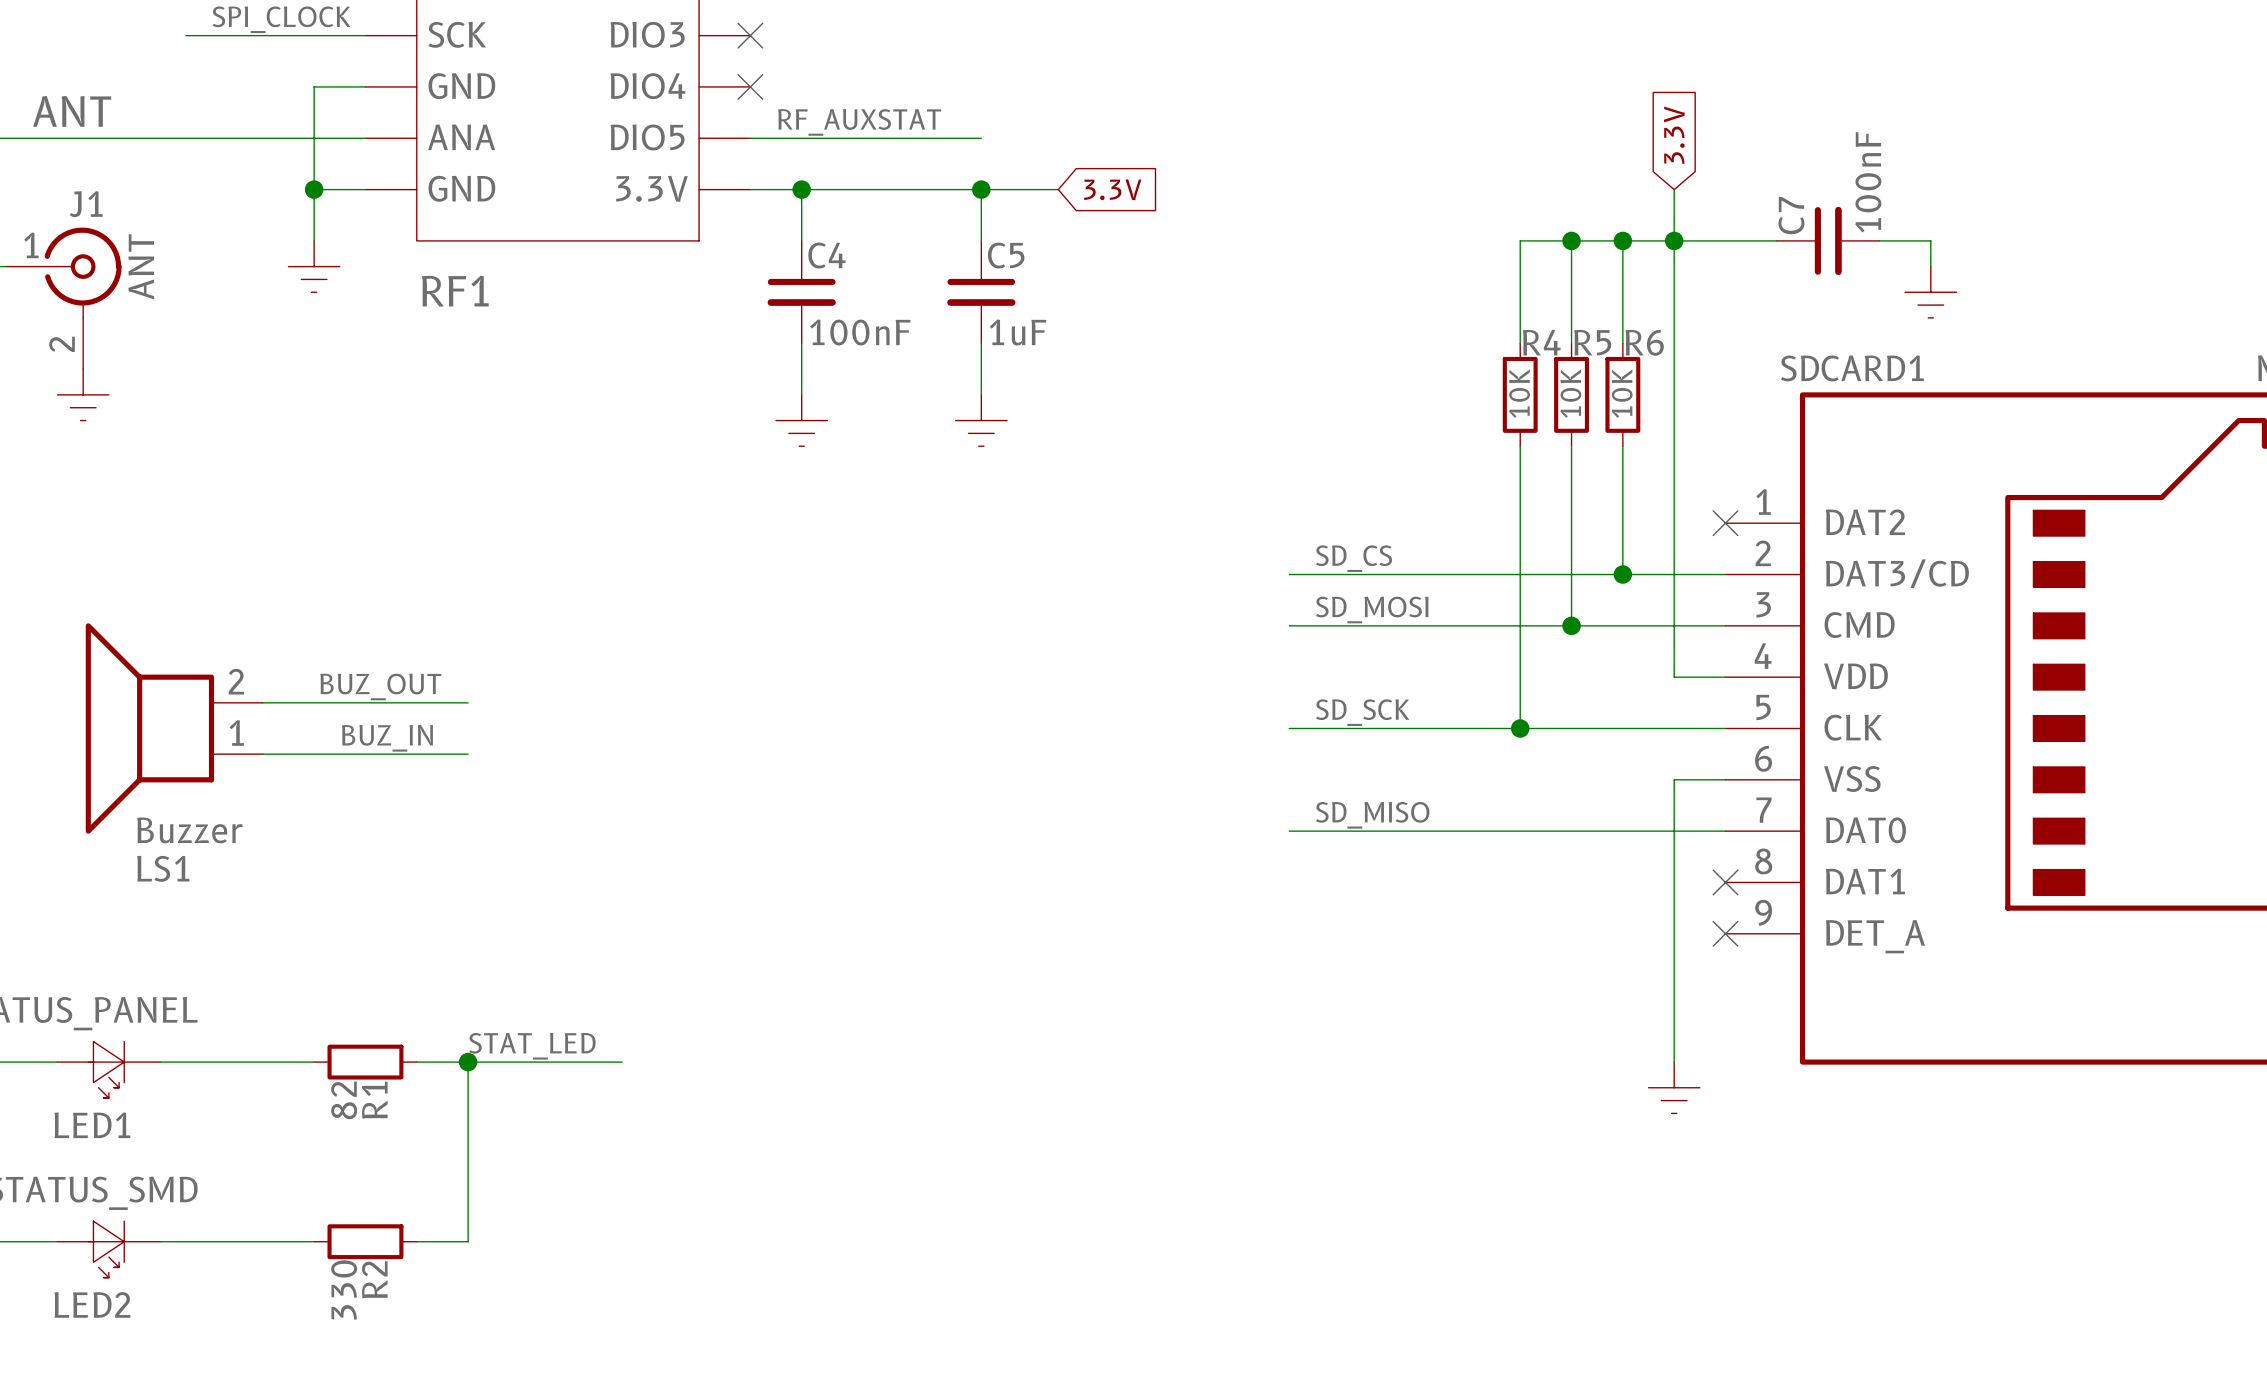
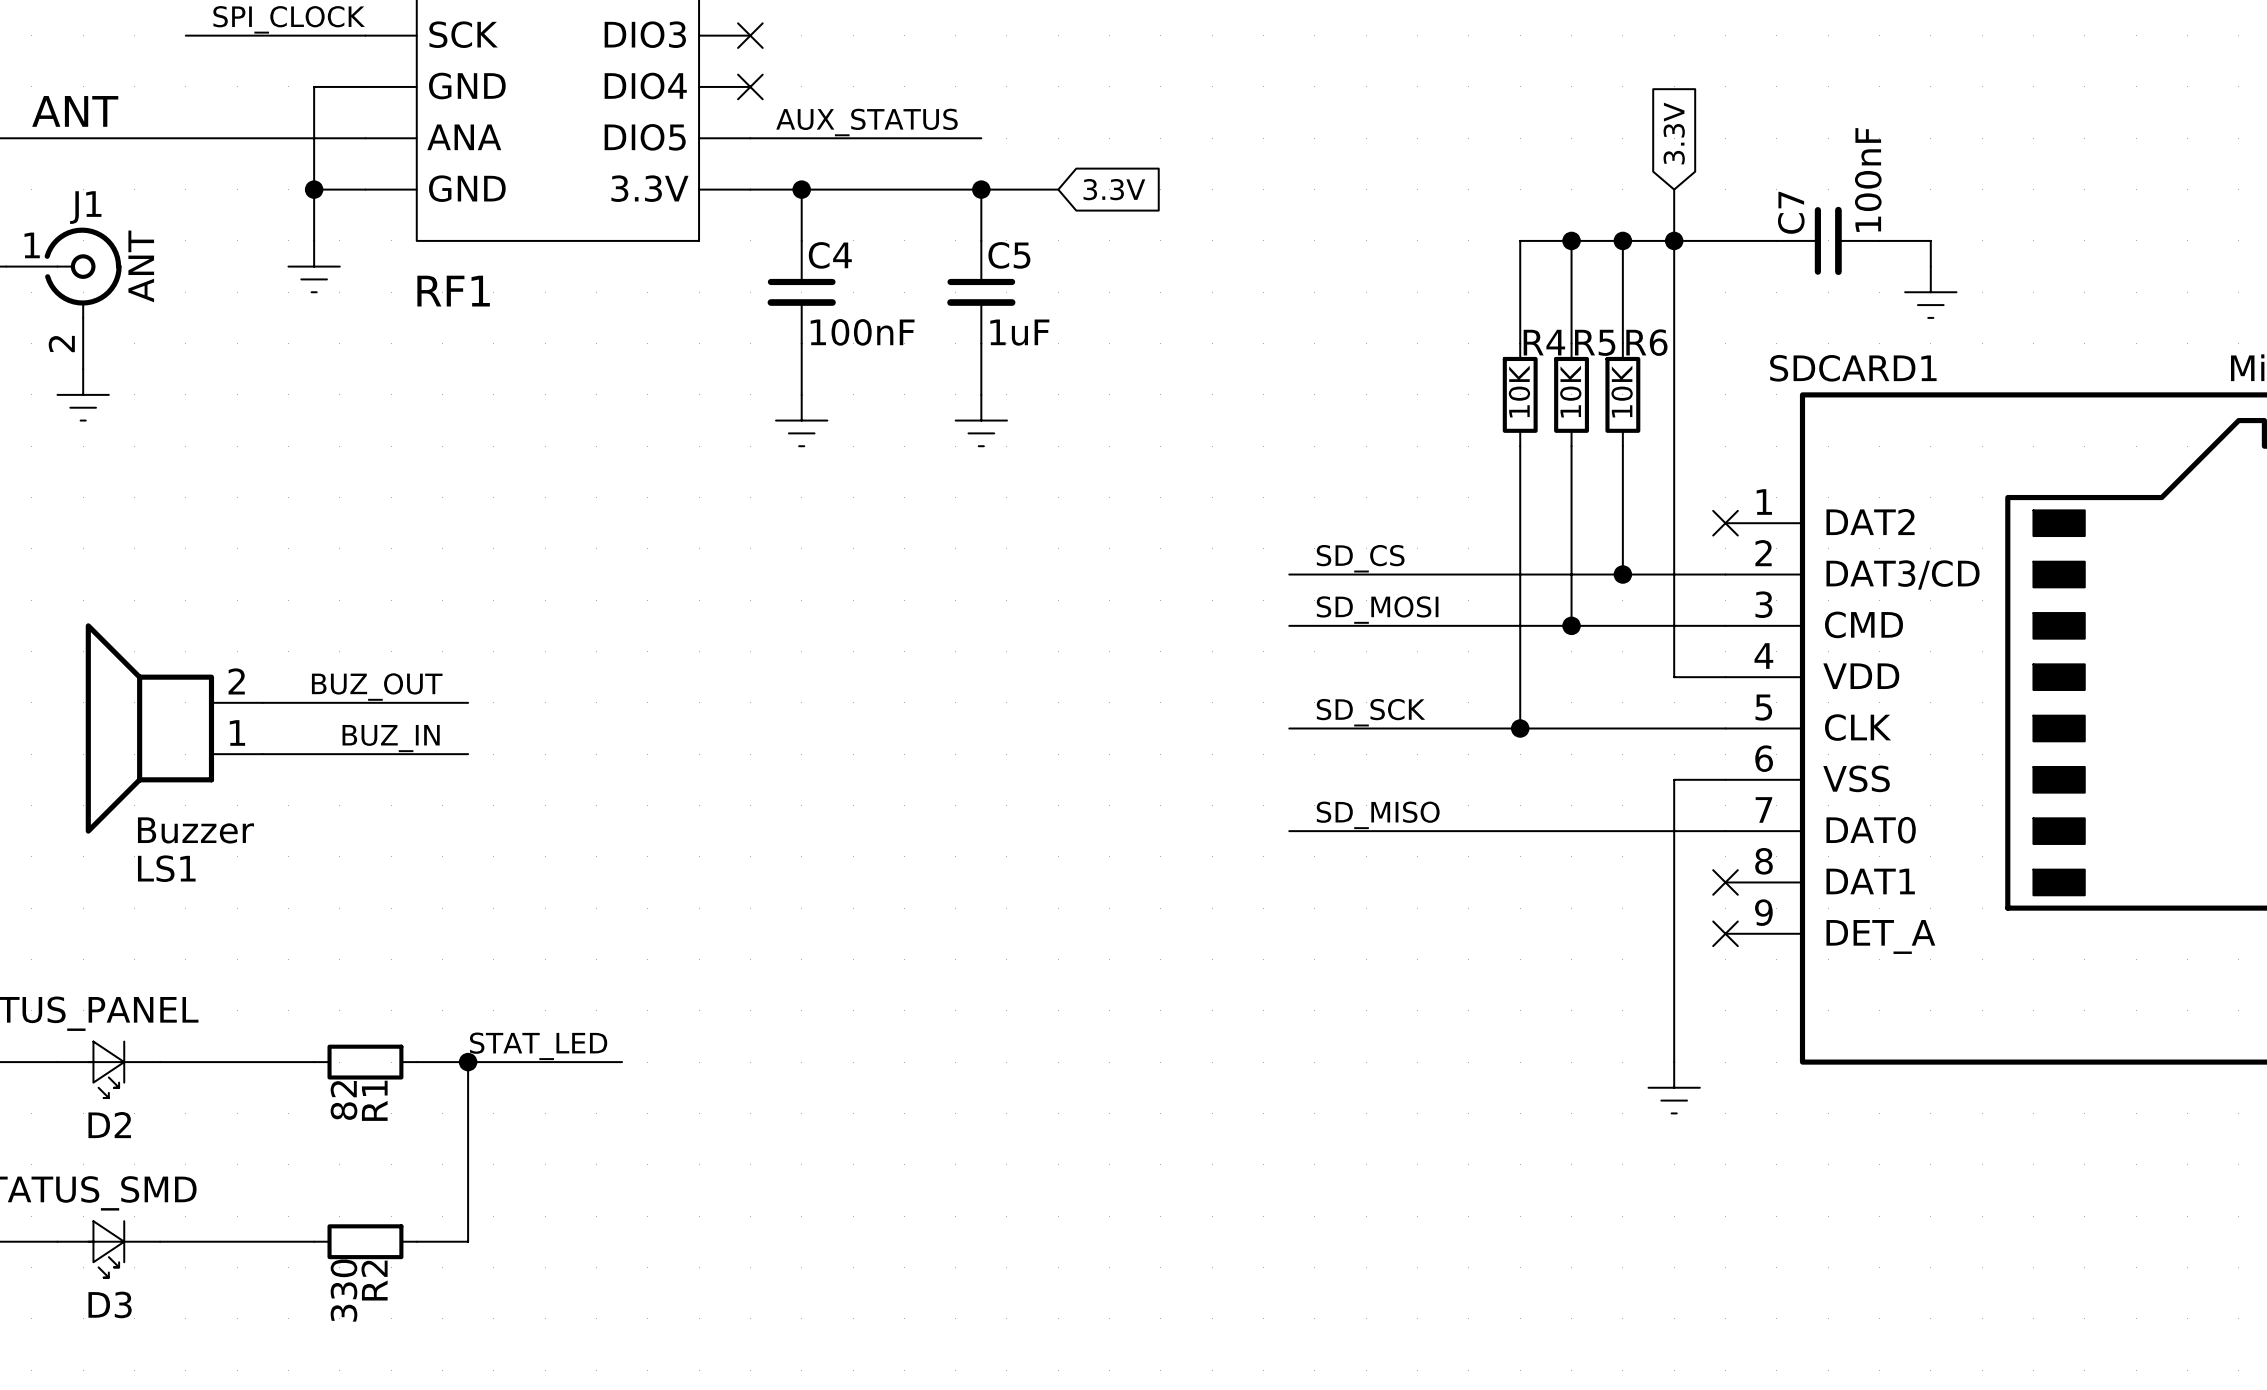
label: RF_AUXSTAT (859, 122) -> AUX_STATUS (866, 122)
LED1 name: LED1 (92, 1125) -> D2 (109, 1125)
LED2 name: LED2 (92, 1304) -> D3 (110, 1304)

